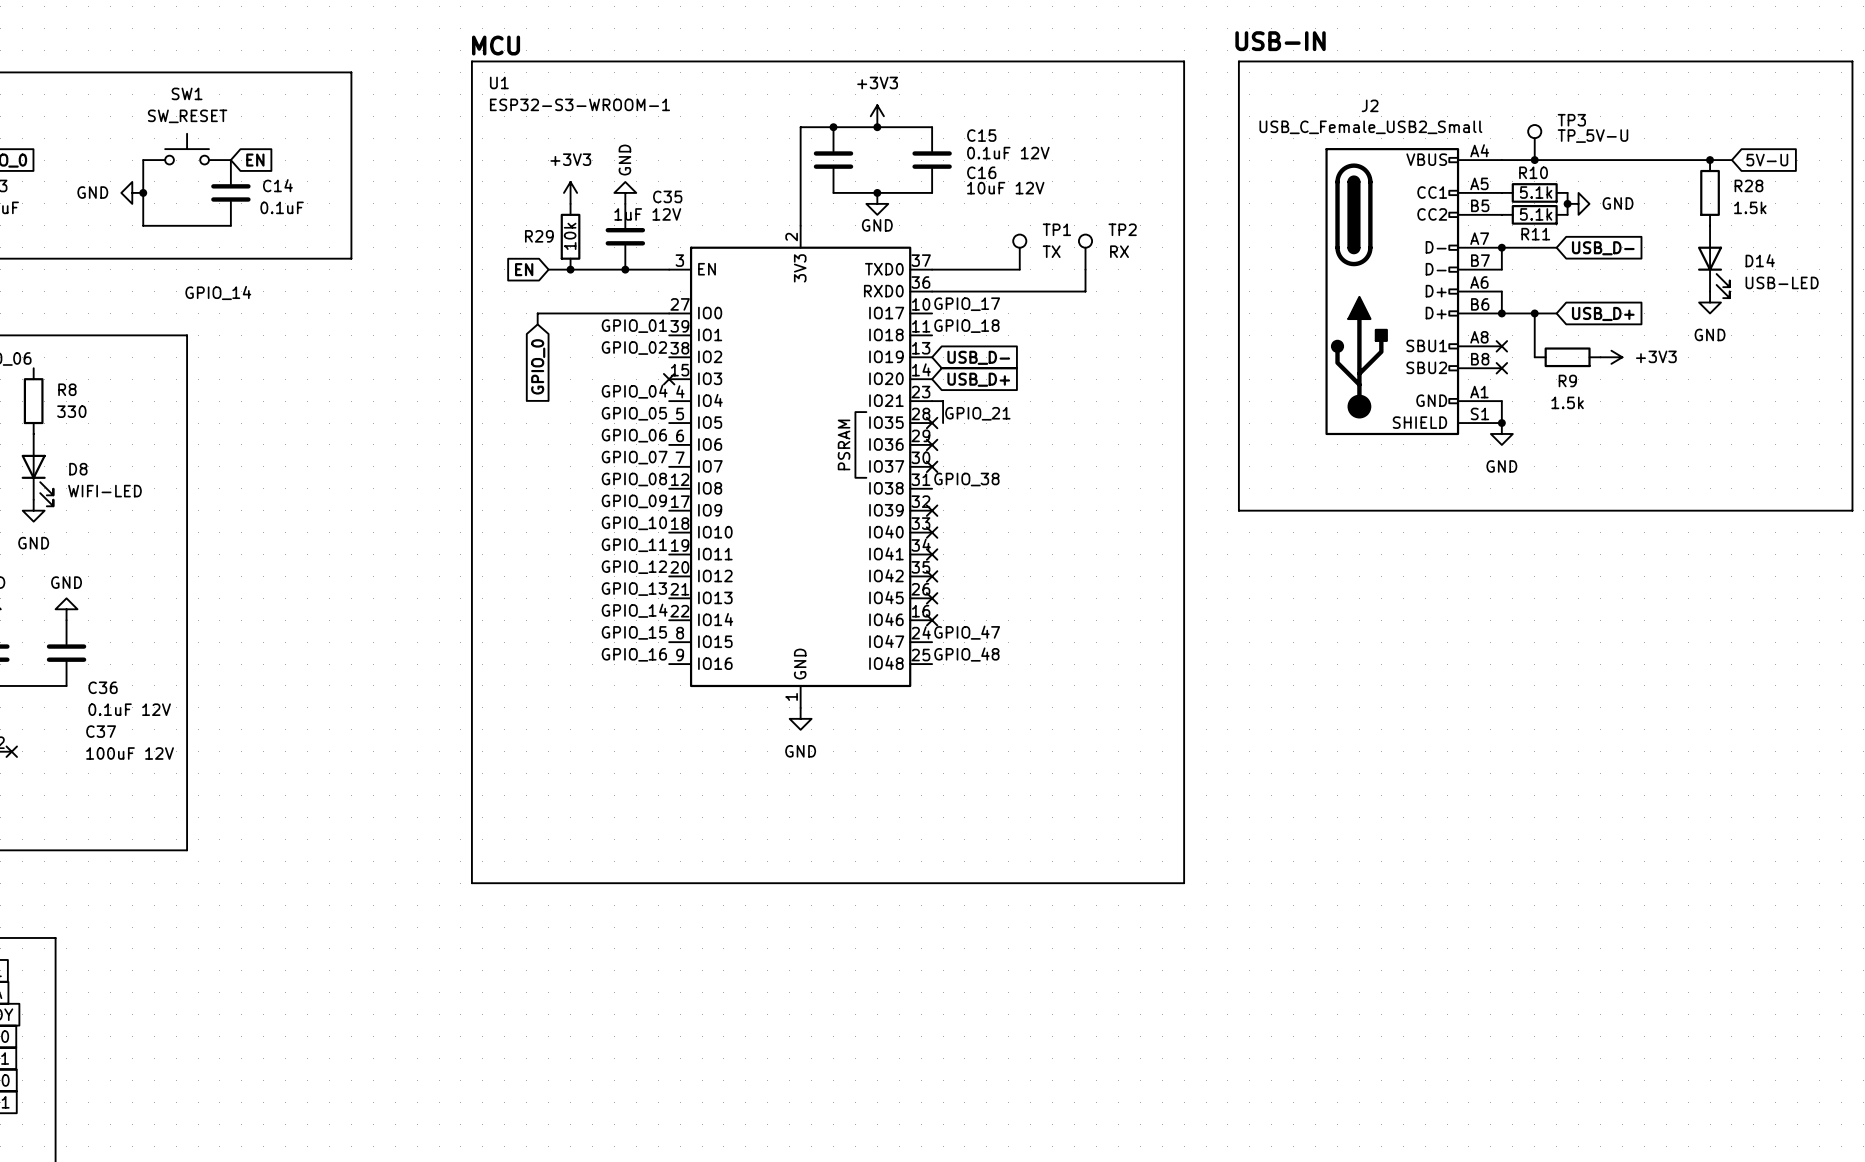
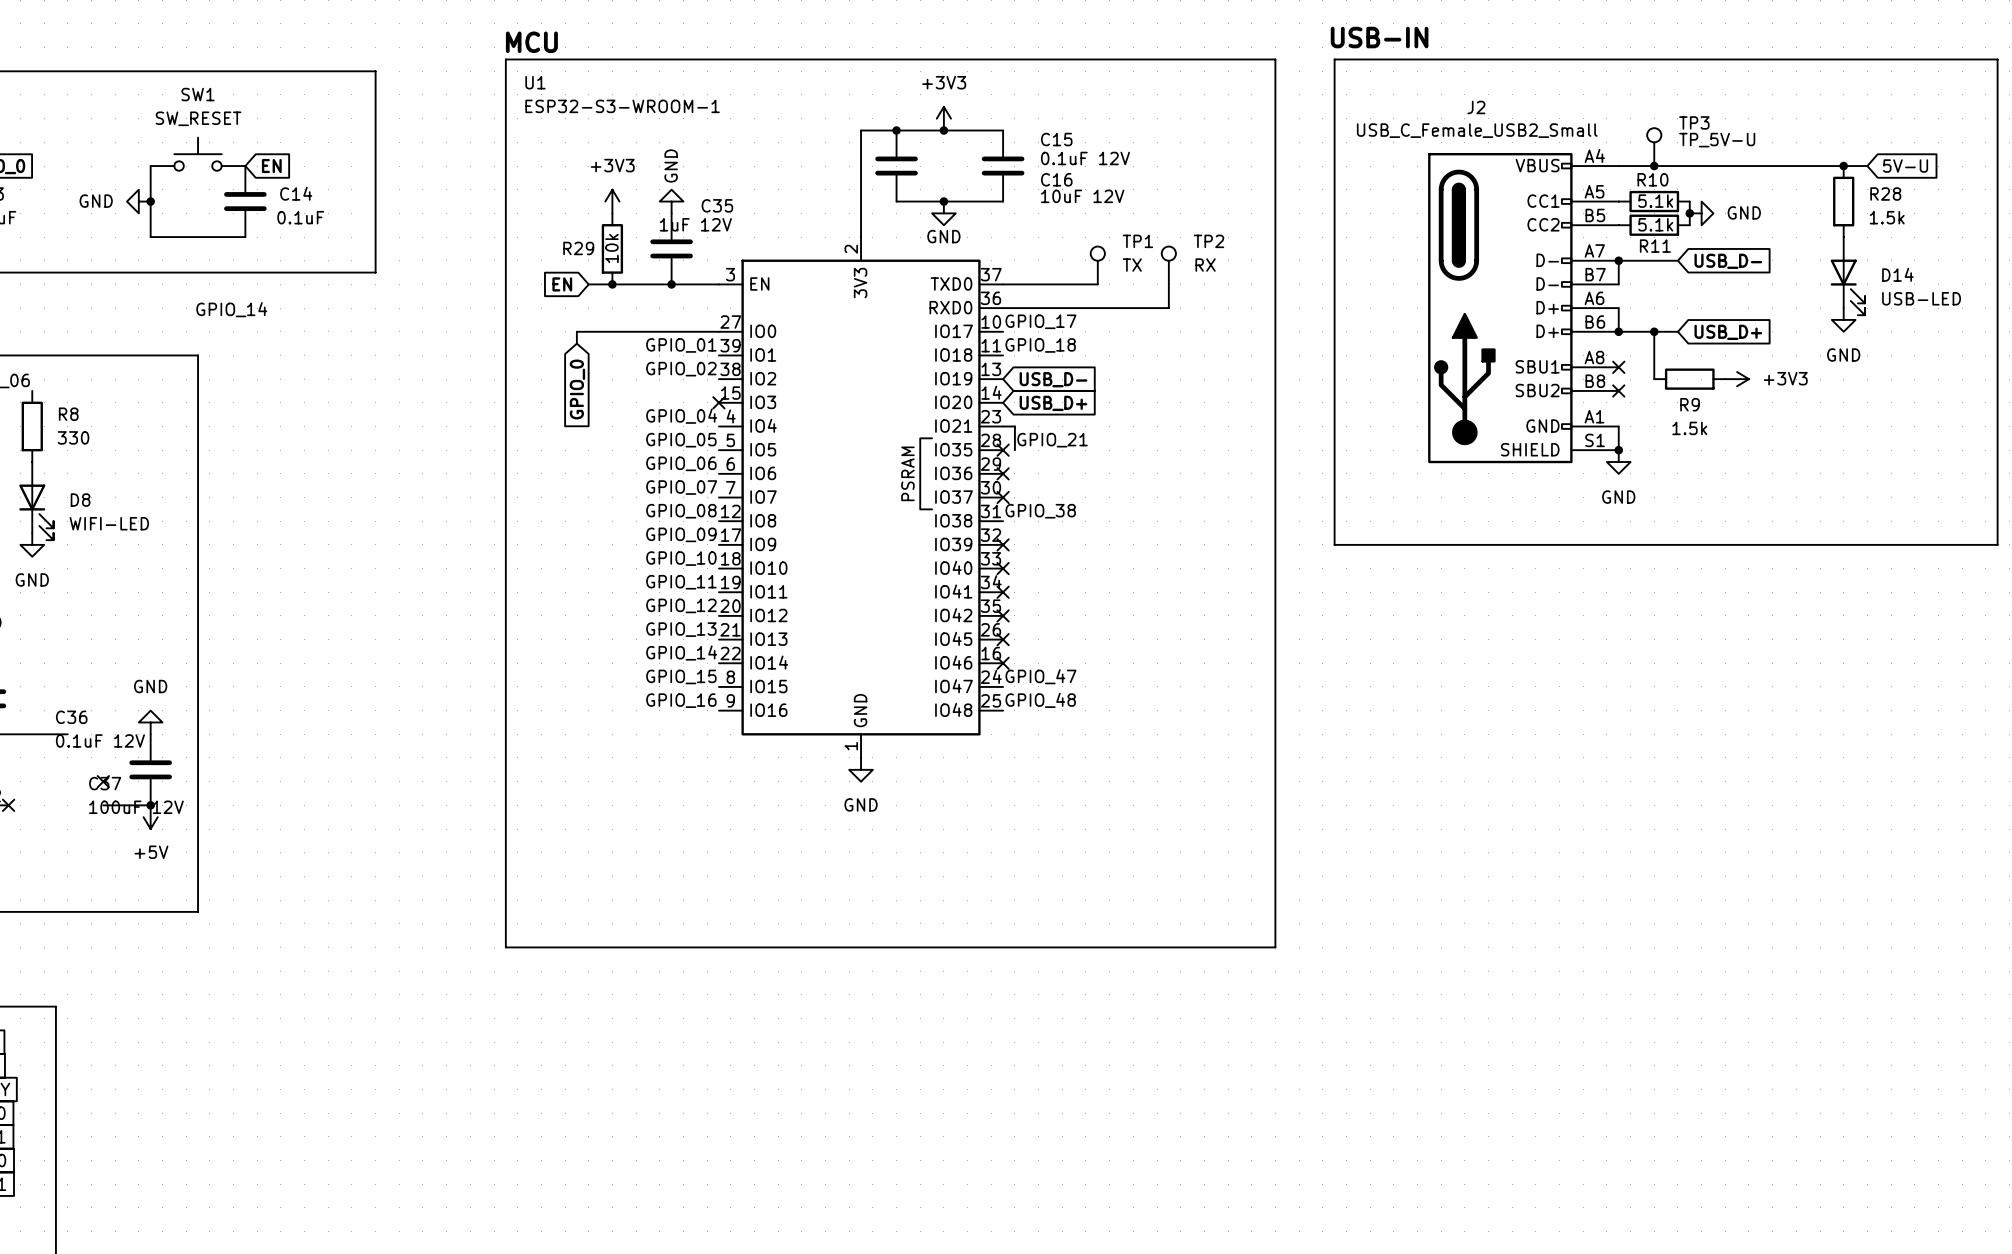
power symbol text position: GND (66, 582) -> GND (150, 686)
power symbol position: GND (66, 609) -> GND (150, 722)
C36 position: (66, 653) -> (150, 769)
C36 name position: C36 (103, 687) -> C36 (71, 717)
C36 value position: 0.1uF 12V (129, 709) -> 0.1uF 12V (100, 740)
no-connect mark: none -> (103, 781)
wire: none -> (103, 805) (150, 805)
junction: none -> (150, 805)
power symbol: none -> +5V (150, 817)

